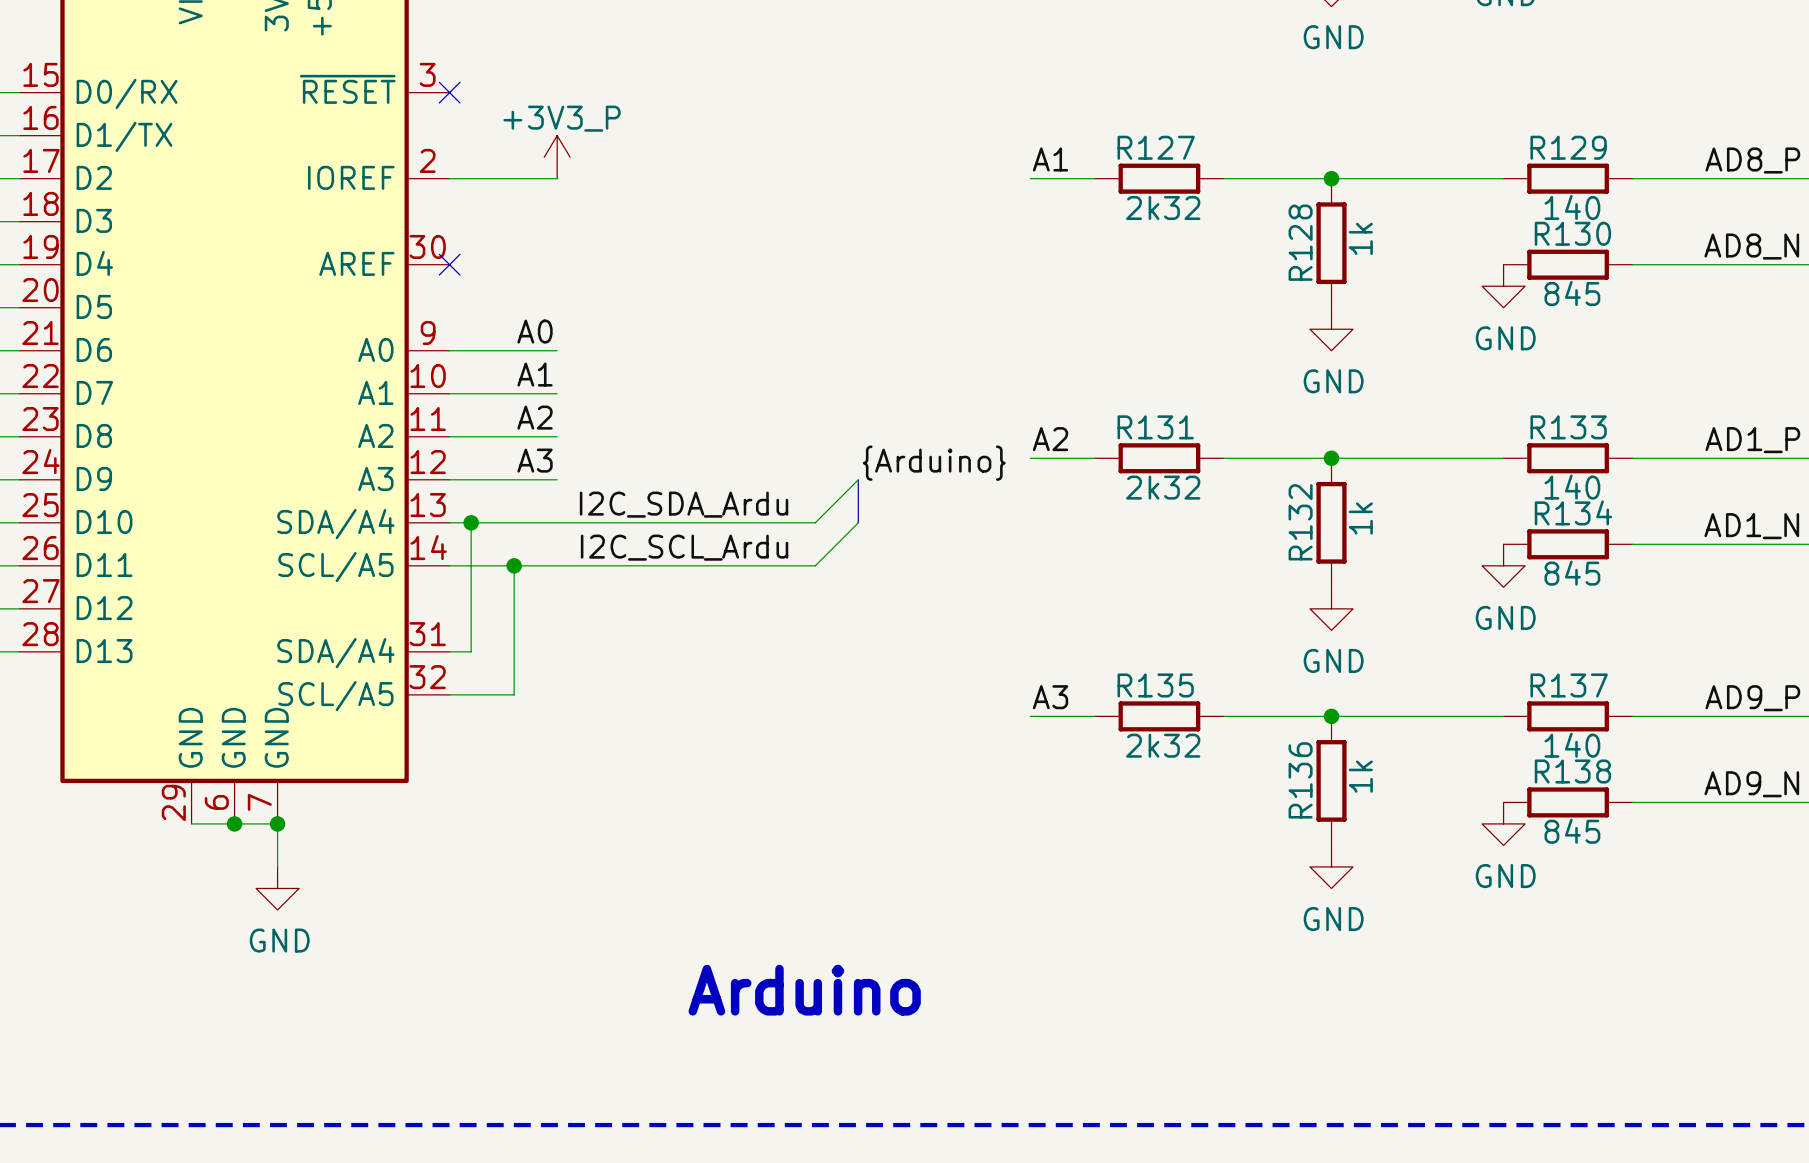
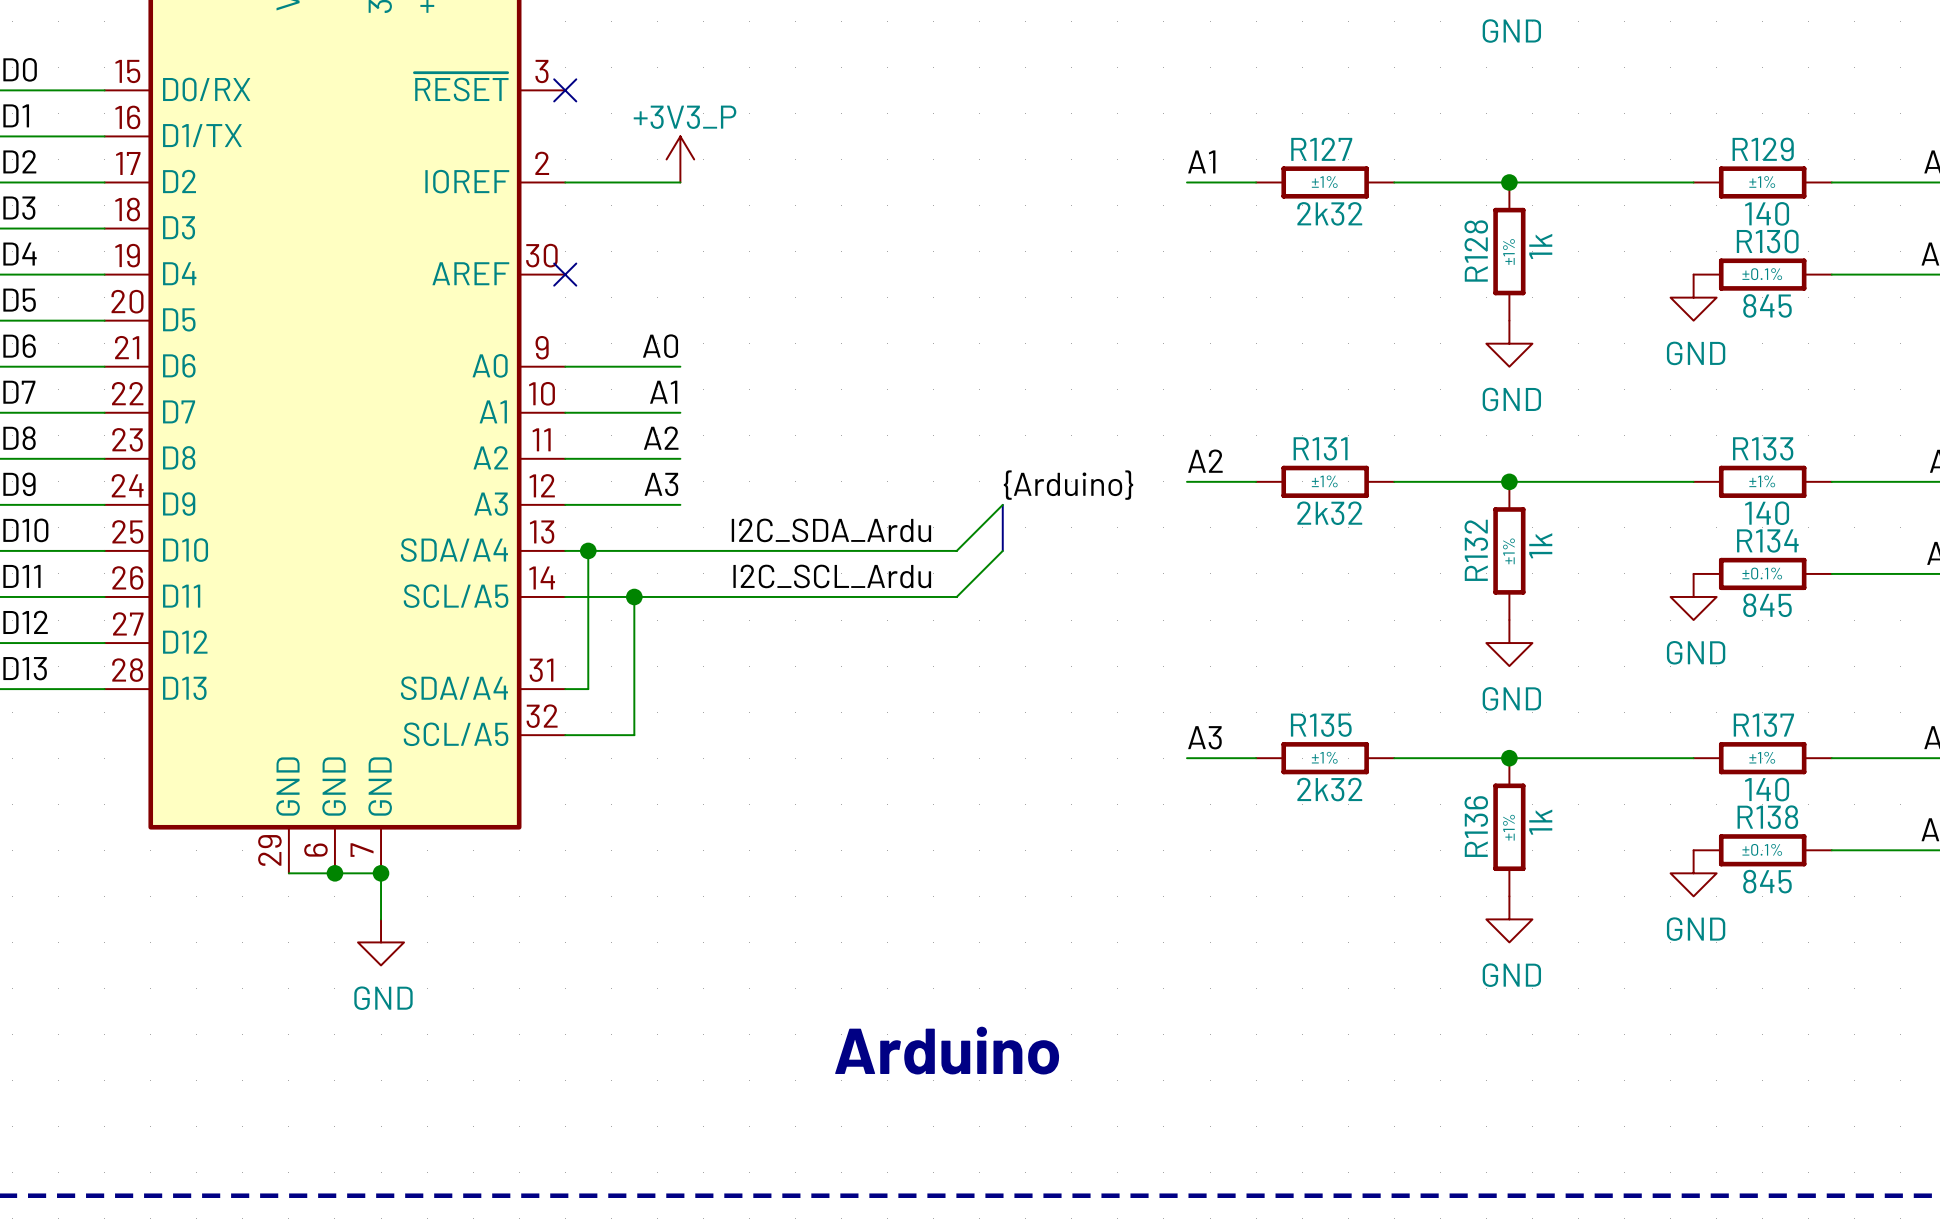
R127 text: none -> ±1% (1324, 182)
R129 text: none -> ±1% (1762, 182)
R128 text: none -> ±1% (1508, 252)
R130 text: none -> ±0.1% (1762, 274)
R131 text: none -> ±1% (1324, 481)
R133 text: none -> ±1% (1762, 481)
R132 text: none -> ±1% (1508, 551)
R134 text: none -> ±0.1% (1762, 573)
R135 text: none -> ±1% (1324, 757)
R137 text: none -> ±1% (1762, 757)
R136 text: none -> ±1% (1508, 827)
R138 text: none -> ±0.1% (1762, 849)

